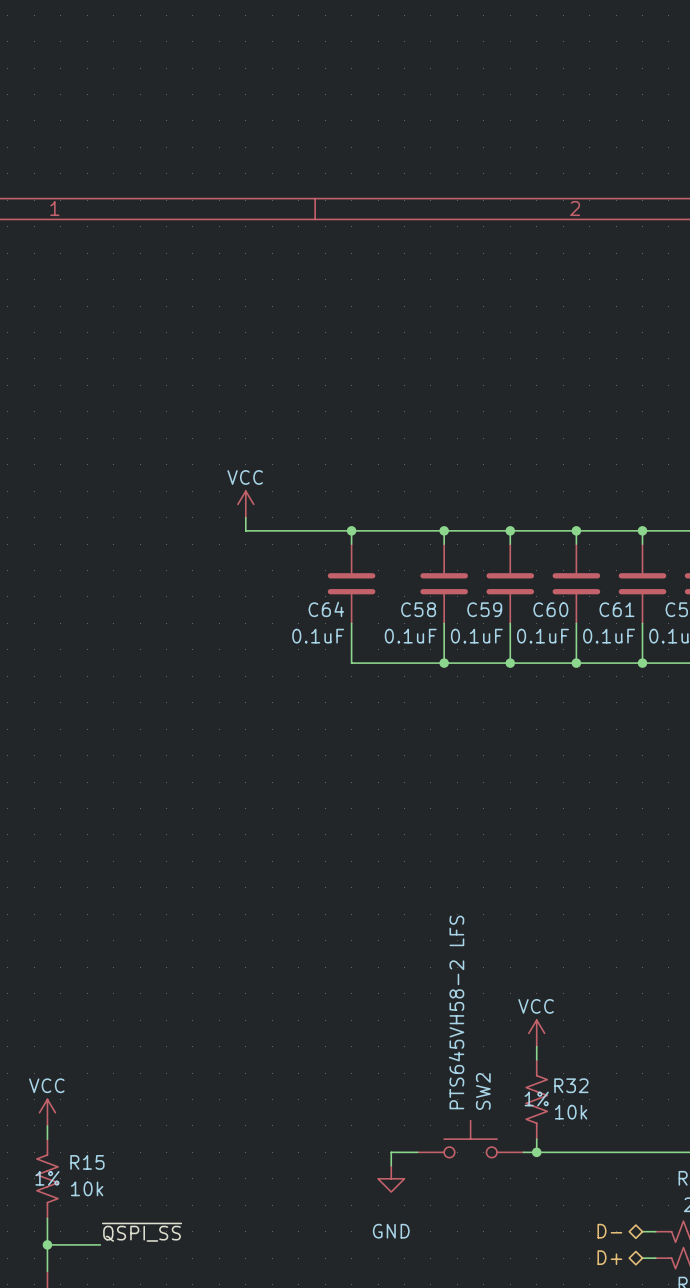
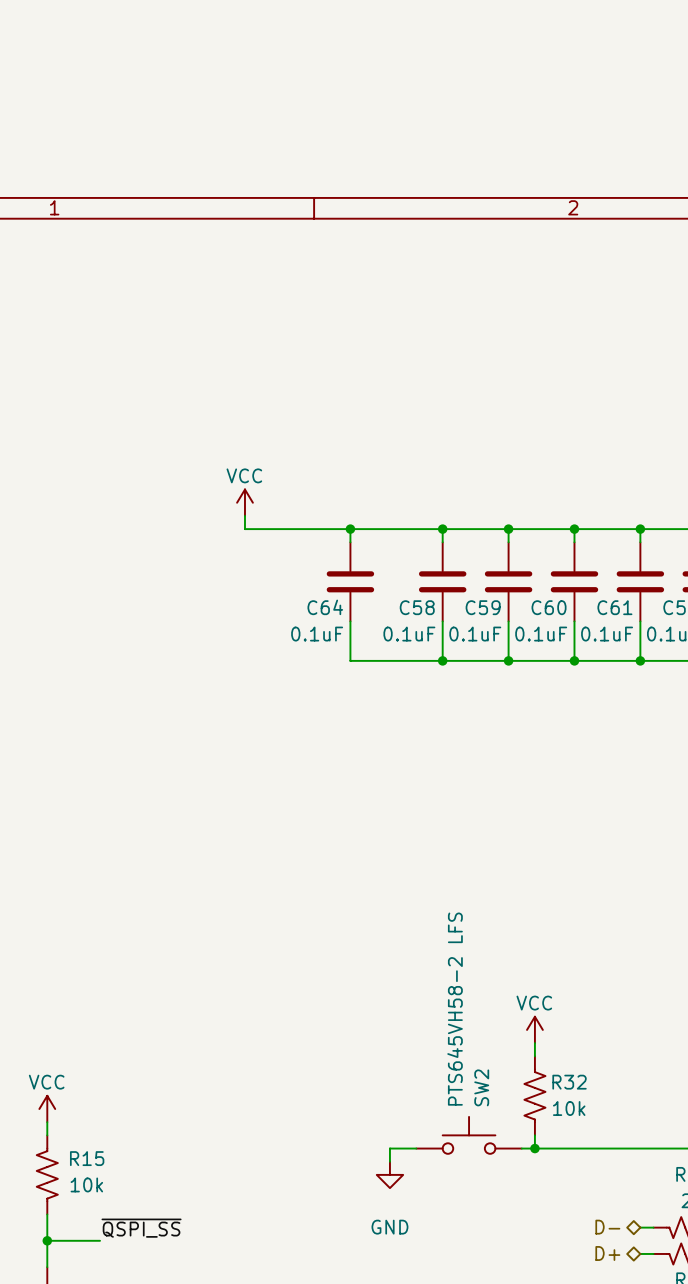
R32 text: 1% (536, 1098) -> none
R15 text: 1% (47, 1178) -> none

